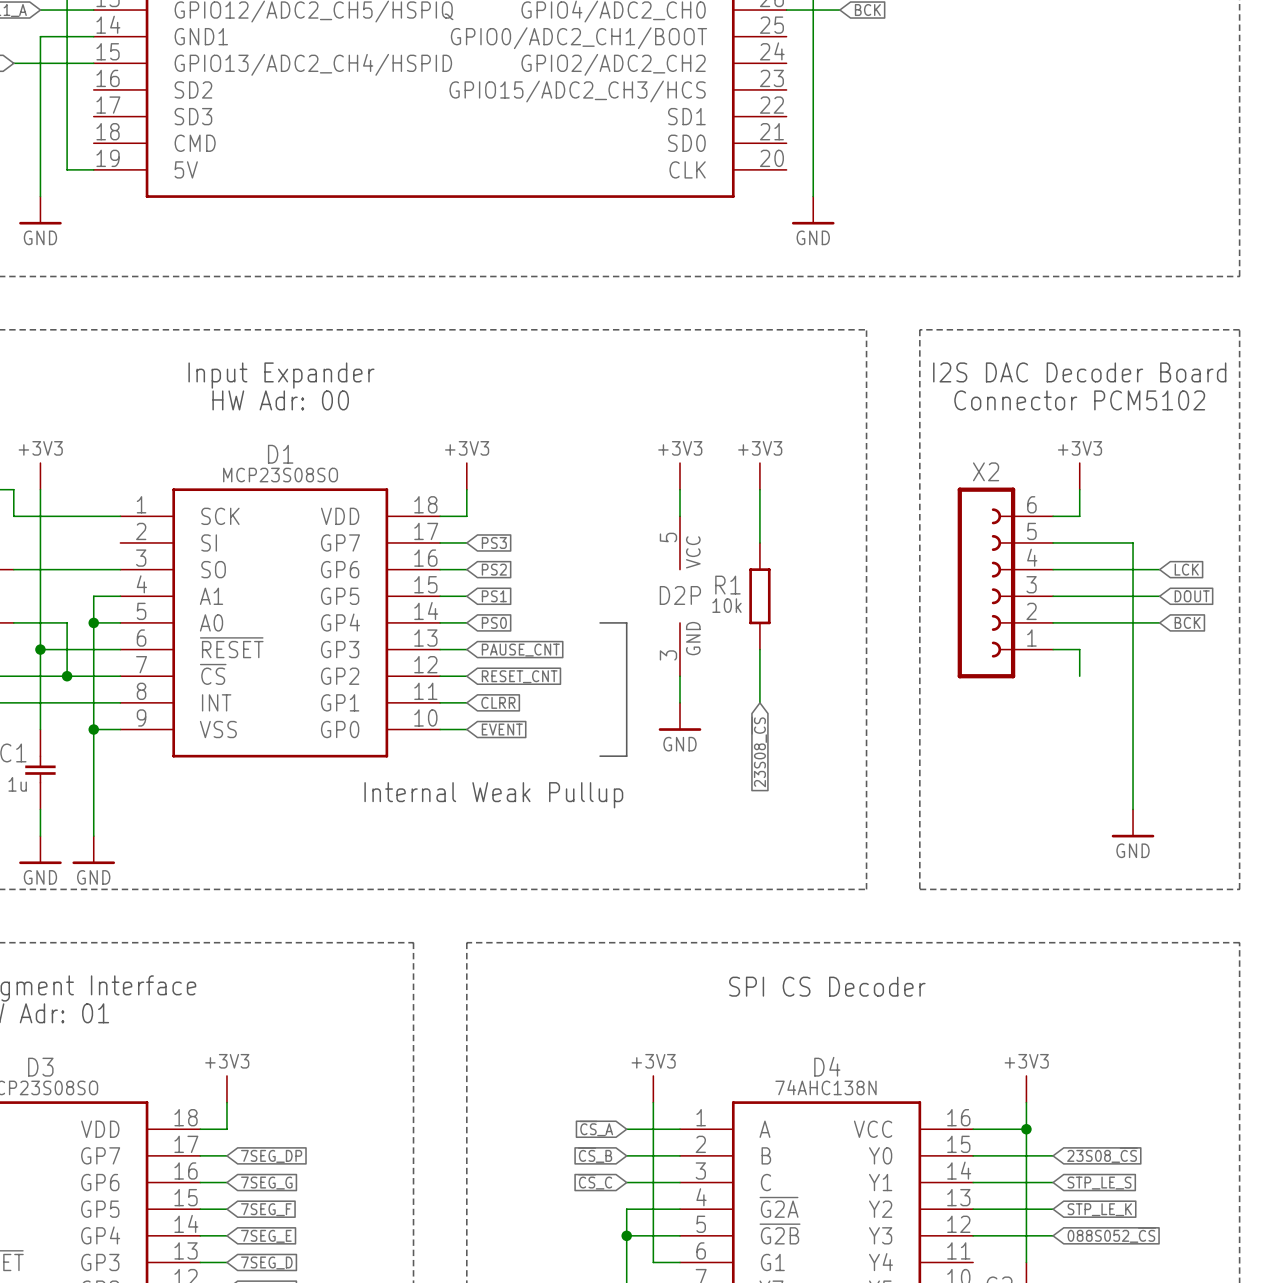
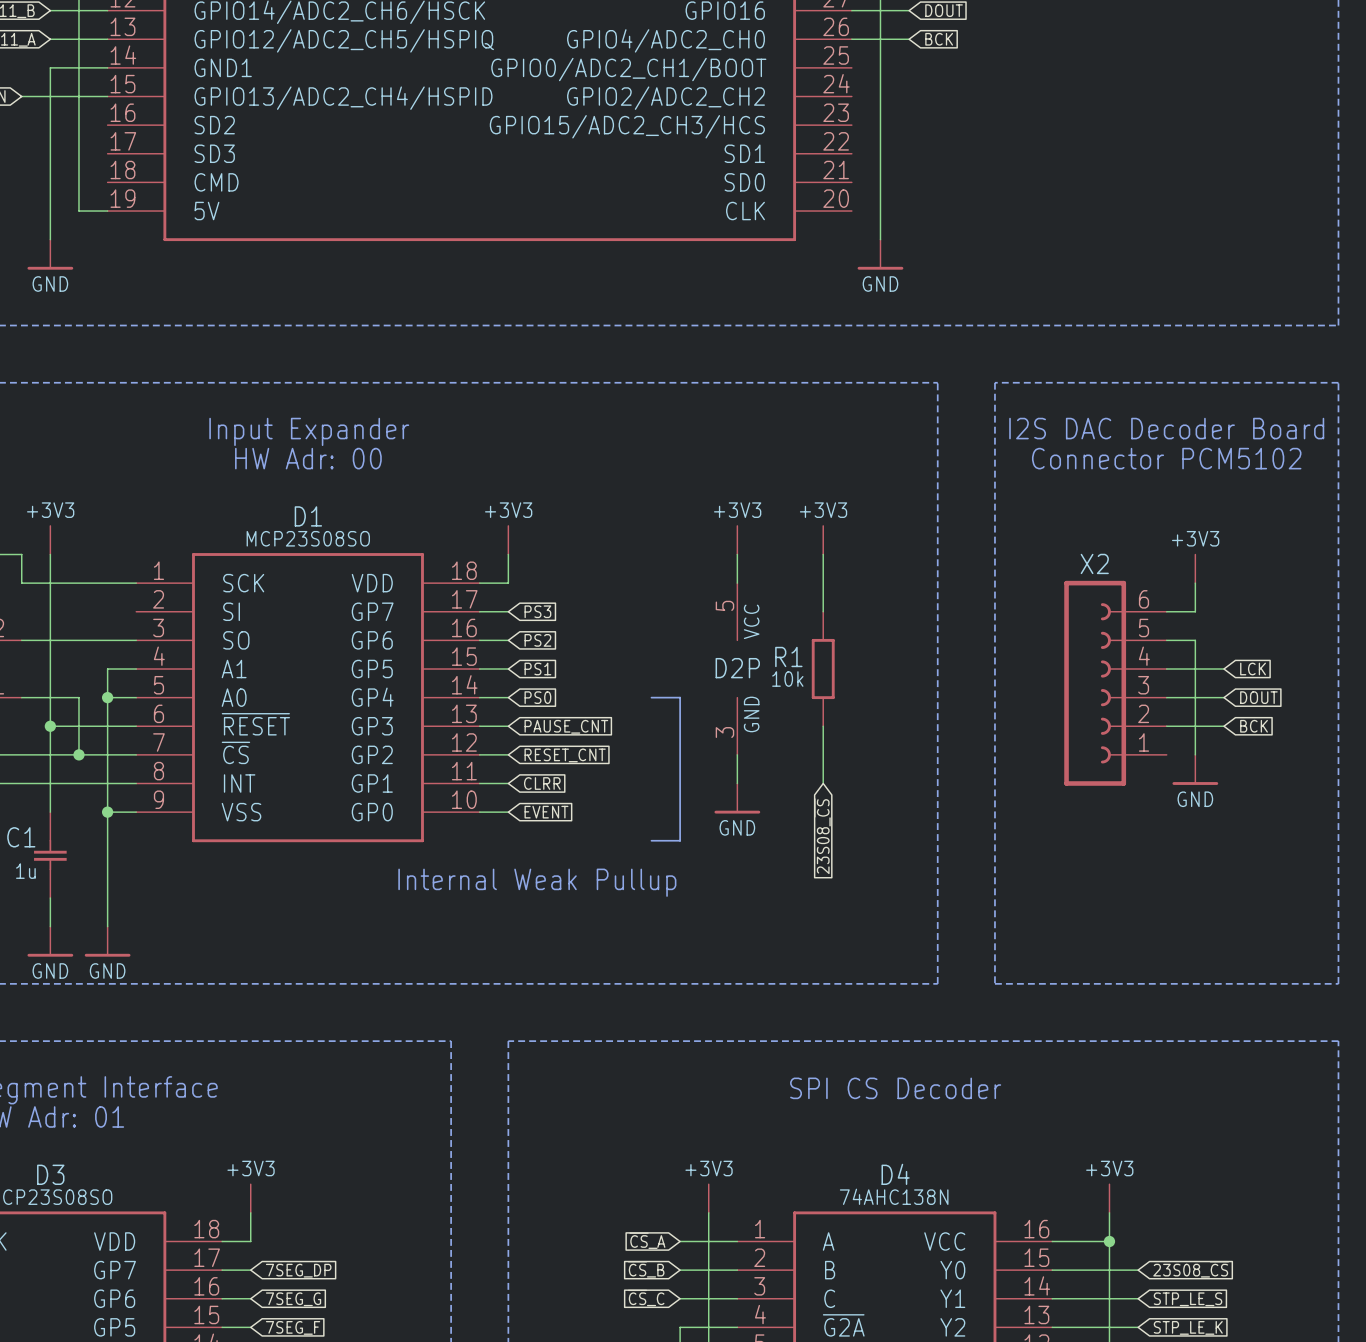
power symbol position: +3V3 (1079, 476) -> +3V3 (1195, 568)
wire: (1079, 489) (1079, 516) (1053, 516) -> none
wire: (1106, 542) (1133, 542) (1133, 809) -> (1195, 611) (1195, 583)
wire: (1106, 569) (1159, 569) -> (1195, 640) (1195, 754)
global label position: LCK (1186, 569) -> LCK (1253, 669)
X2 position: (1005, 582) -> (1115, 683)
wire: (1133, 596) (1159, 596) -> none
global label position: DOUT (1192, 596) -> DOUT (1258, 697)
wire: (1133, 622) (1159, 622) -> none
global label position: BCK (1187, 622) -> BCK (1254, 726)
wire: (1053, 649) (1079, 649) (1079, 676) -> none
wire: none -> (1166, 726) (1223, 726)
power symbol position: GND (1133, 823) -> GND (1195, 769)

